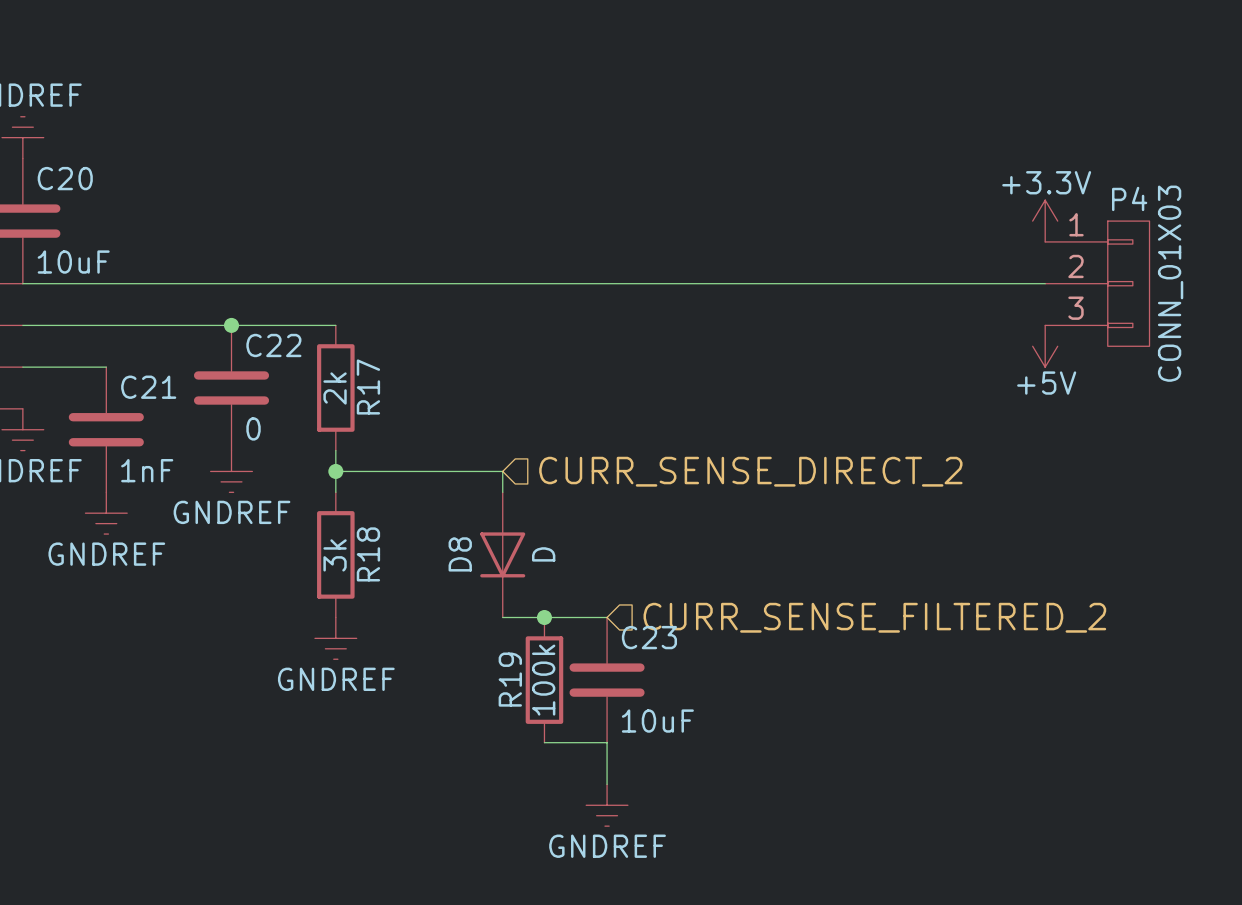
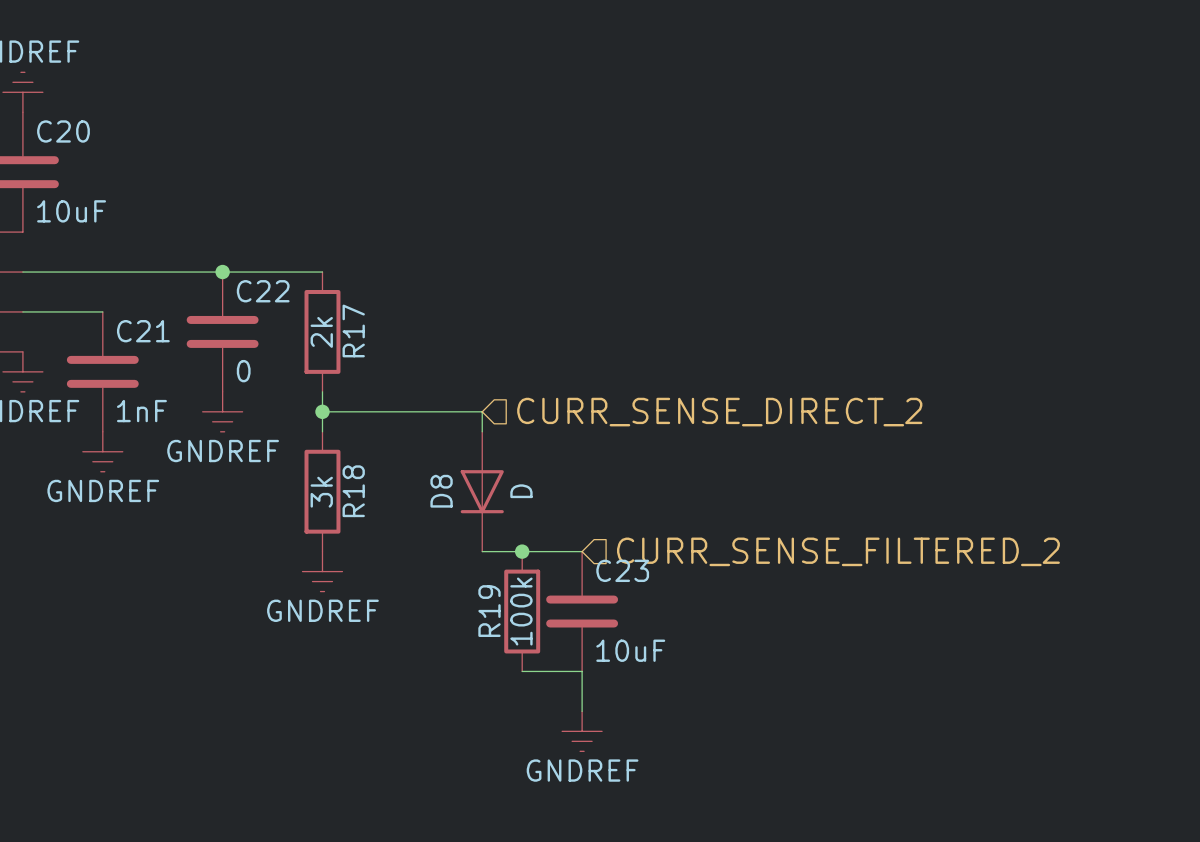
power symbol: +3.3V (1045, 221) -> none
wire: (22, 283) (1045, 283) -> none
P4: CONN_01X03 (1097, 283) -> none
power symbol: +5V (1045, 346) -> none

